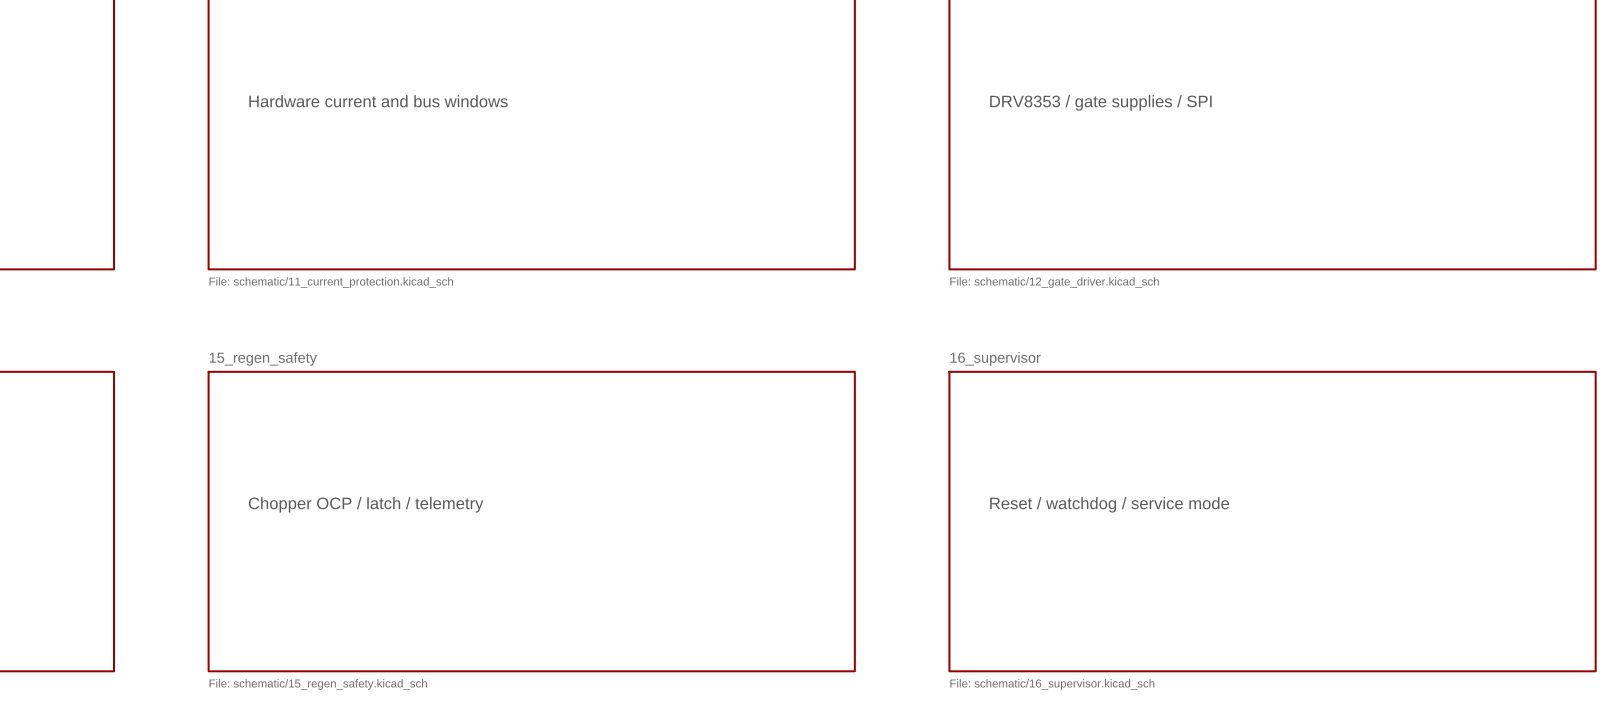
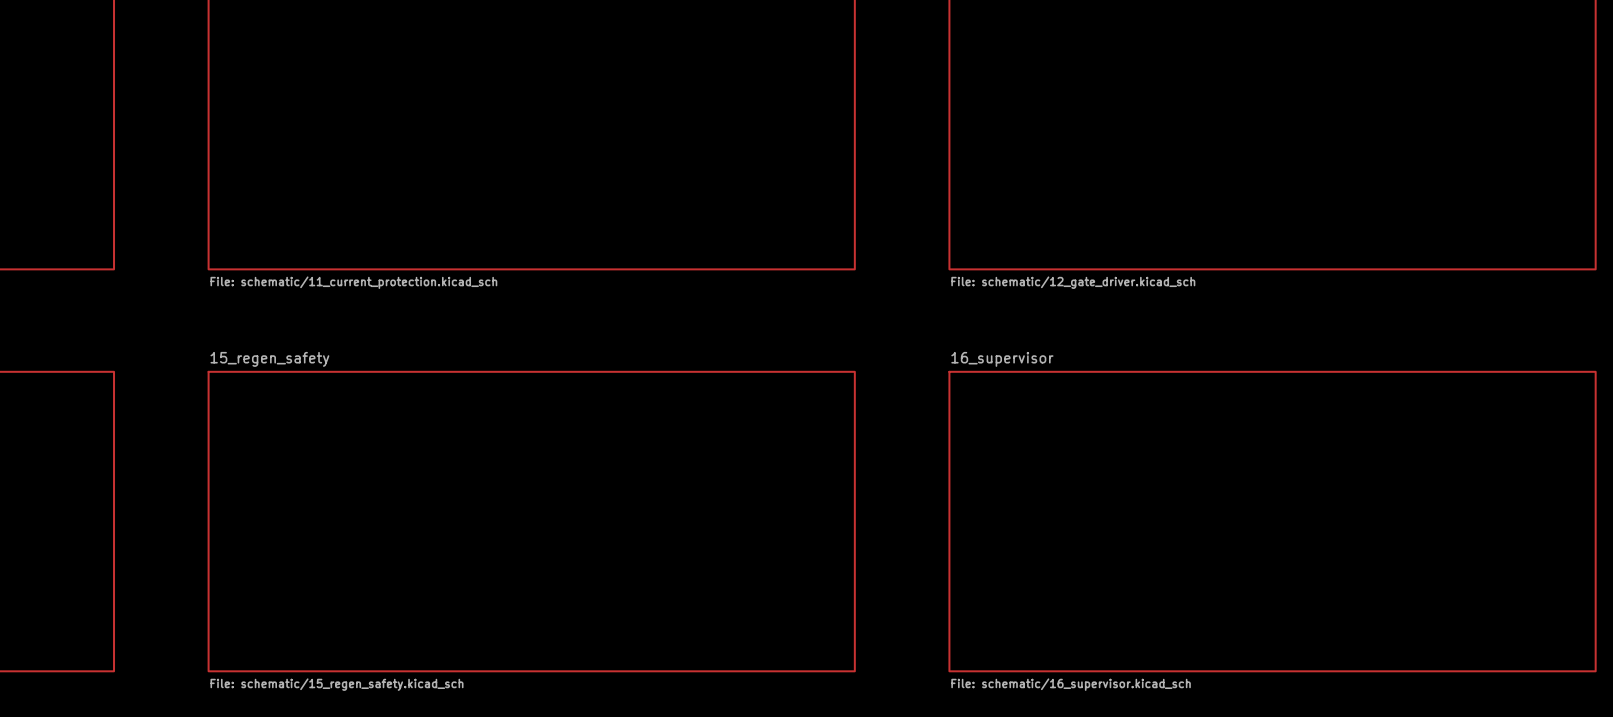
text: Hardware current and bus windows (378, 101) -> none
text: DRV8353 / gate supplies / SPI (1100, 102) -> none
text: Chopper OCP / latch / telemetry (366, 504) -> none
text: Reset / watchdog / service mode (1109, 504) -> none

